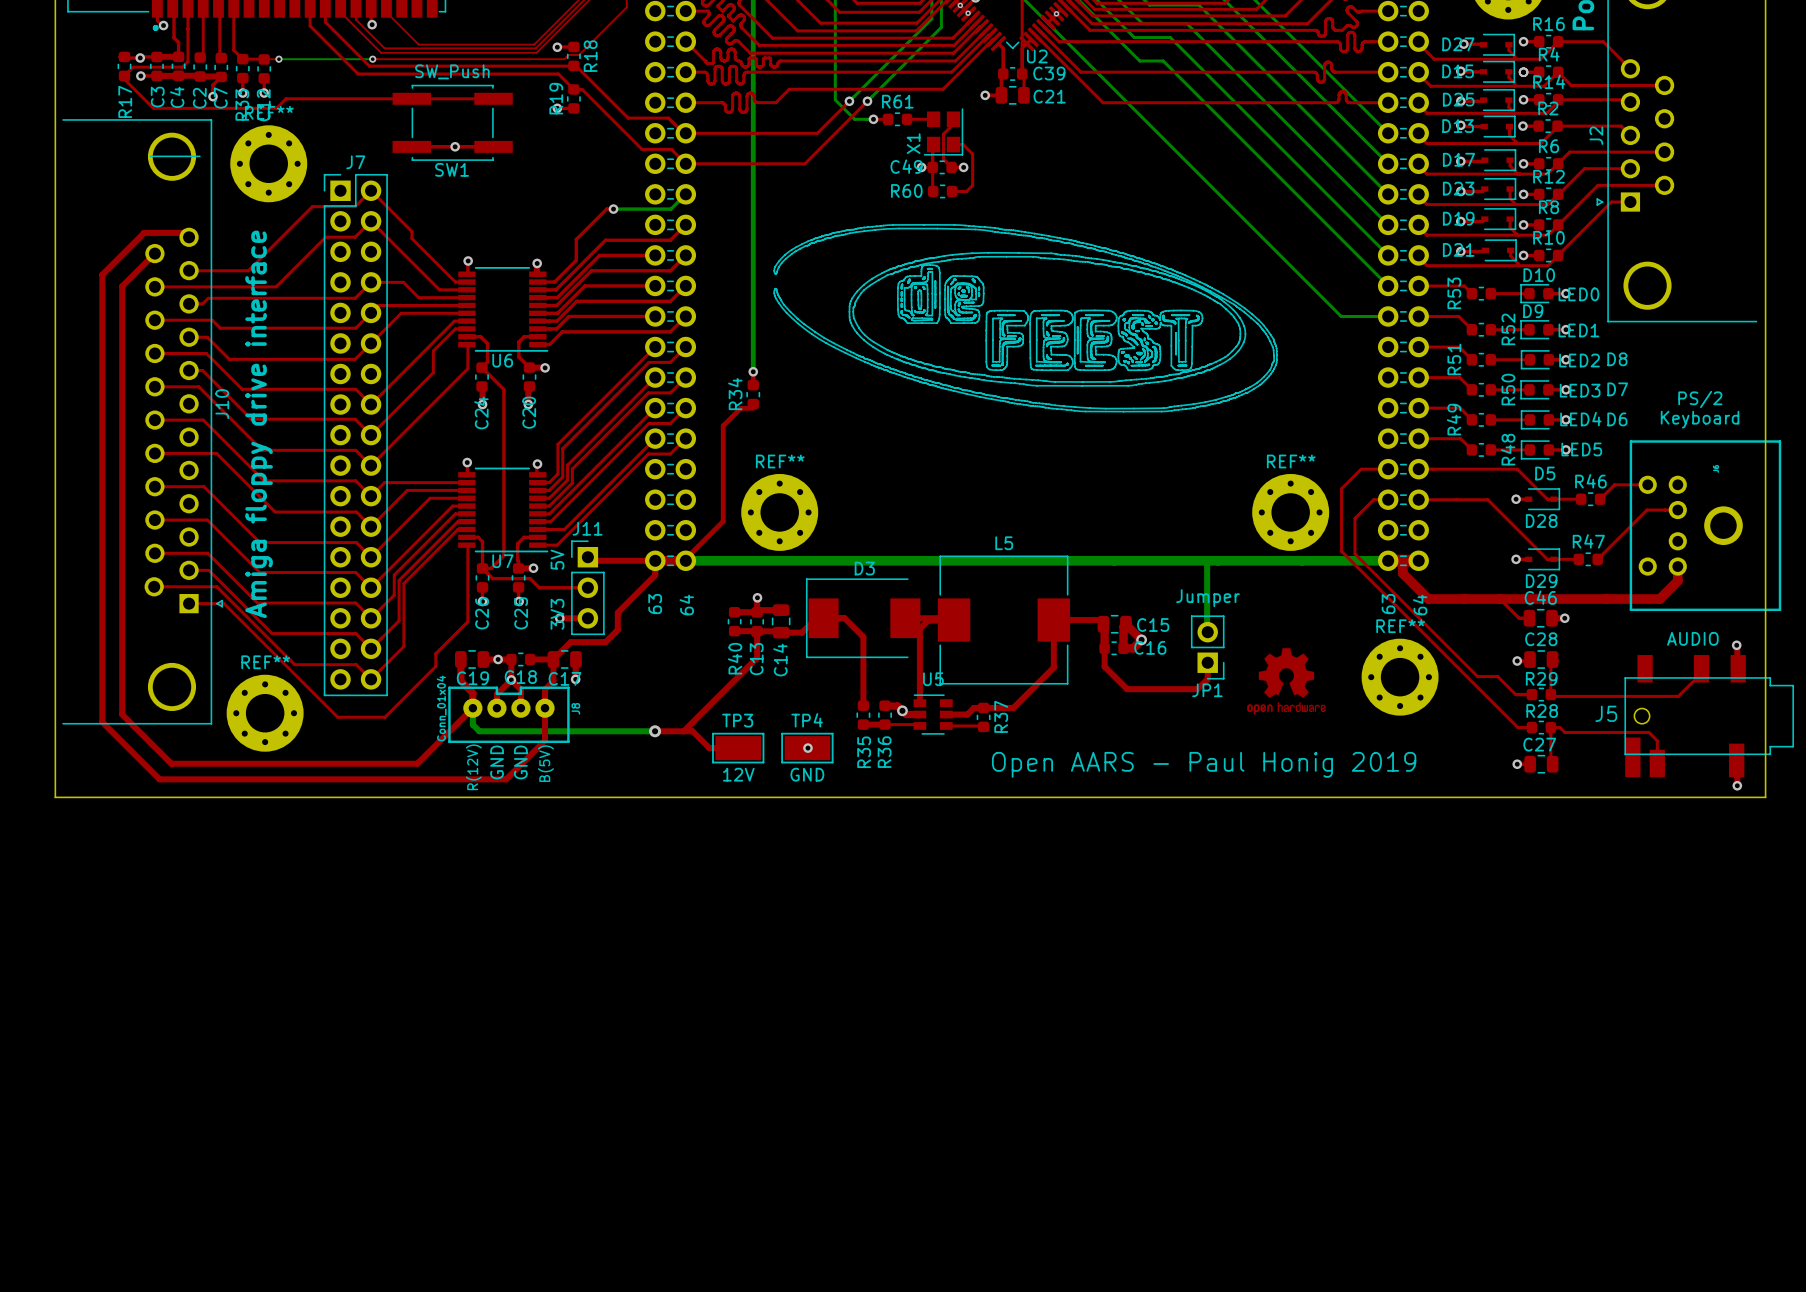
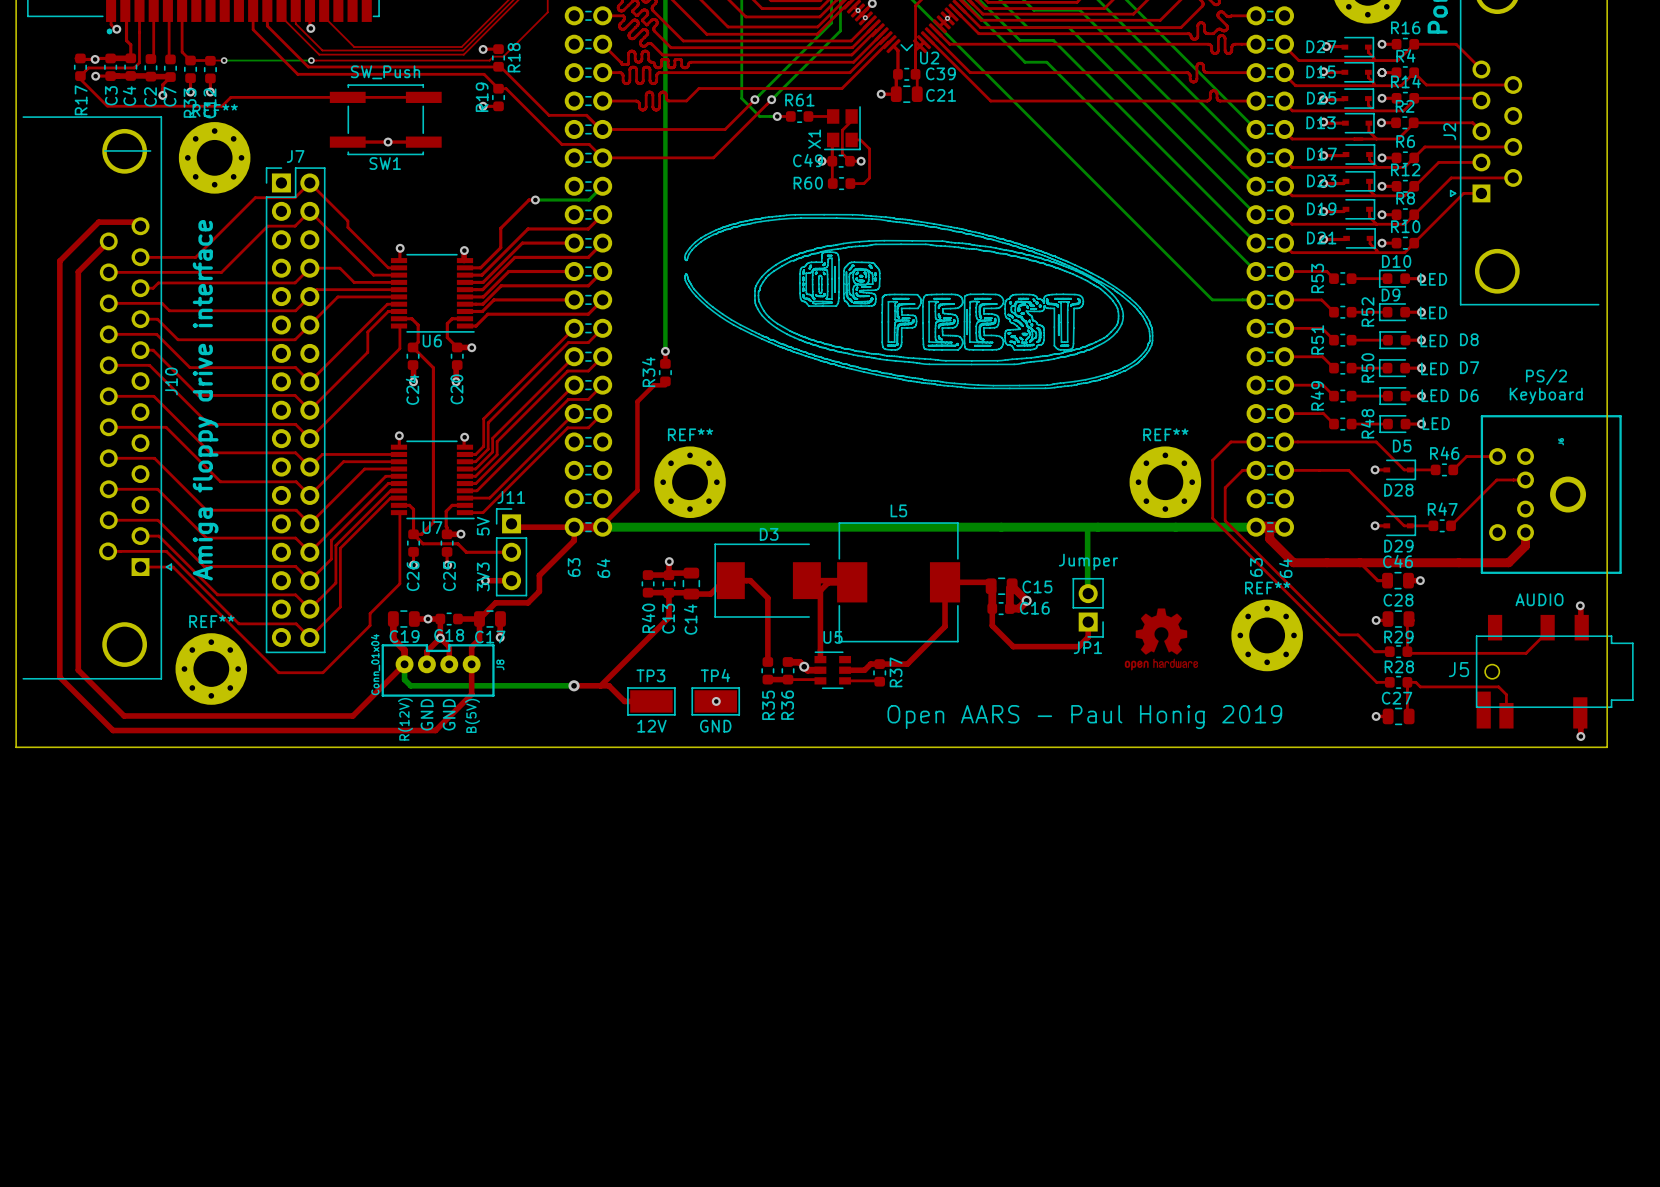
D10 value: LED0 (1578, 294) -> LED (1433, 279)
D9 value: LED1 (1578, 330) -> LED (1433, 312)
D8 value: LED2 (1579, 360) -> LED (1434, 340)
D7 value: LED3 (1580, 390) -> LED (1434, 368)
D6 value: LED4 (1580, 419) -> LED (1435, 395)
D5 value: LED5 (1581, 449) -> LED (1436, 423)

